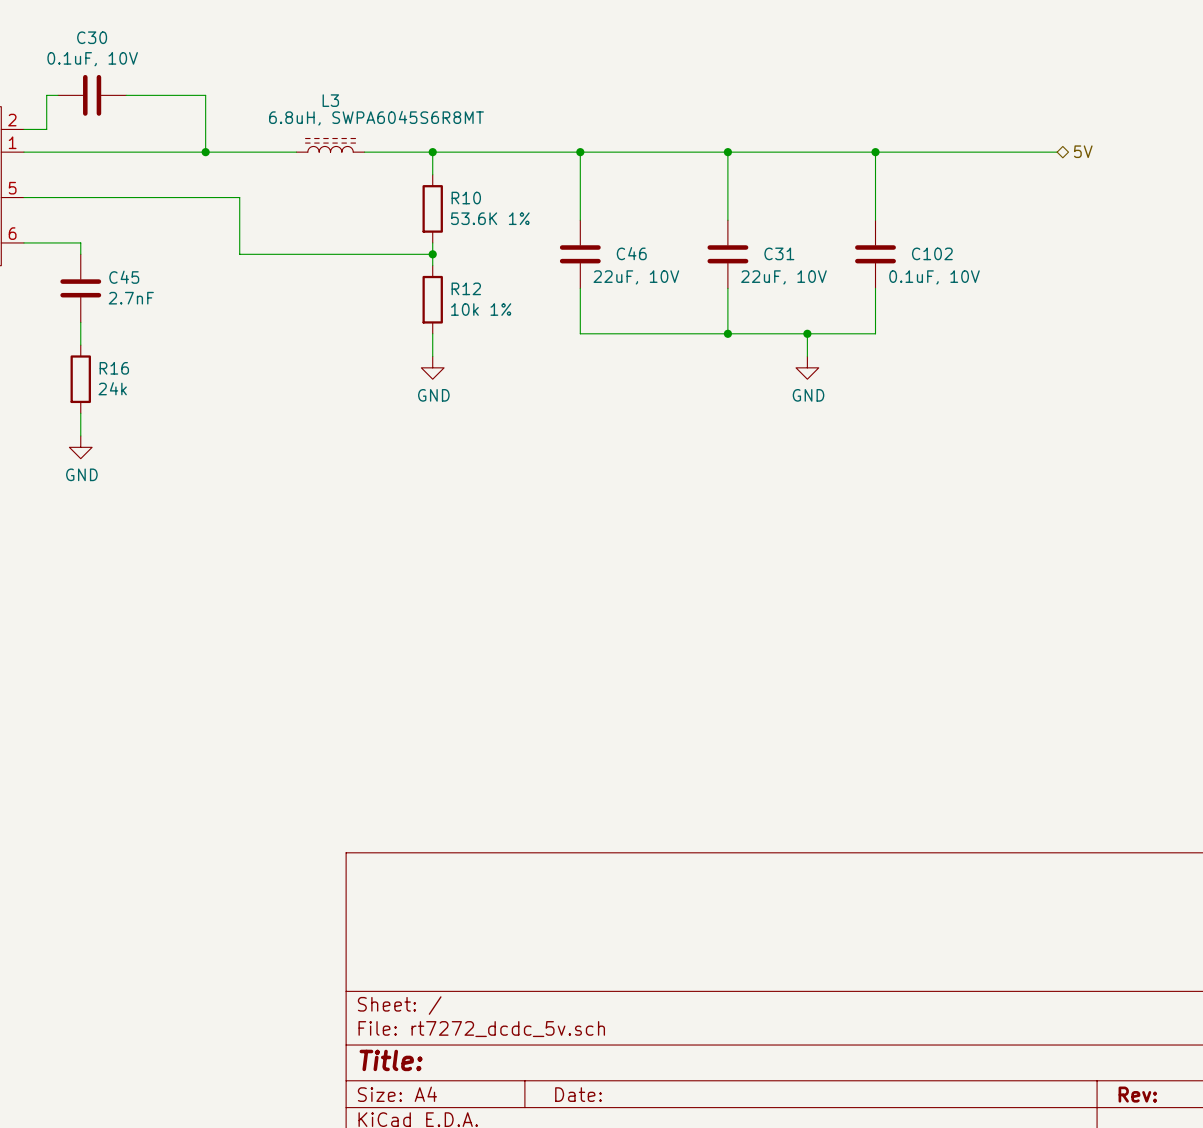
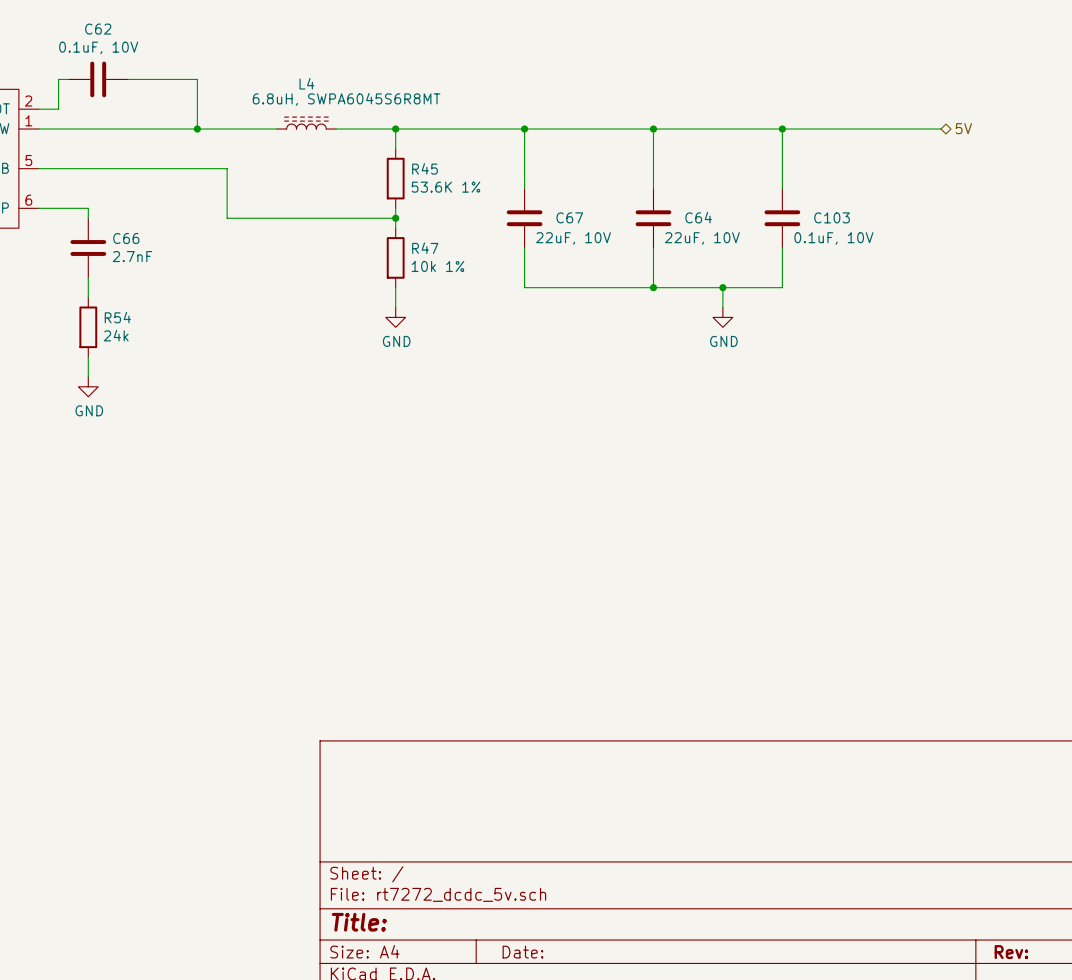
C30 name: C30 (92, 37) -> C62 (98, 29)
L3 name: L3 (330, 100) -> L4 (306, 83)
R10 name: R10 (466, 198) -> R45 (424, 168)
C46 name: C46 (631, 253) -> C67 (569, 217)
C31 name: C31 (779, 253) -> C64 (698, 217)
C102 name: C102 (932, 253) -> C103 (832, 217)
C45 name: C45 (124, 277) -> C66 (126, 238)
R12 name: R12 (466, 288) -> R47 (425, 248)
R16 name: R16 (114, 368) -> R54 (117, 317)

